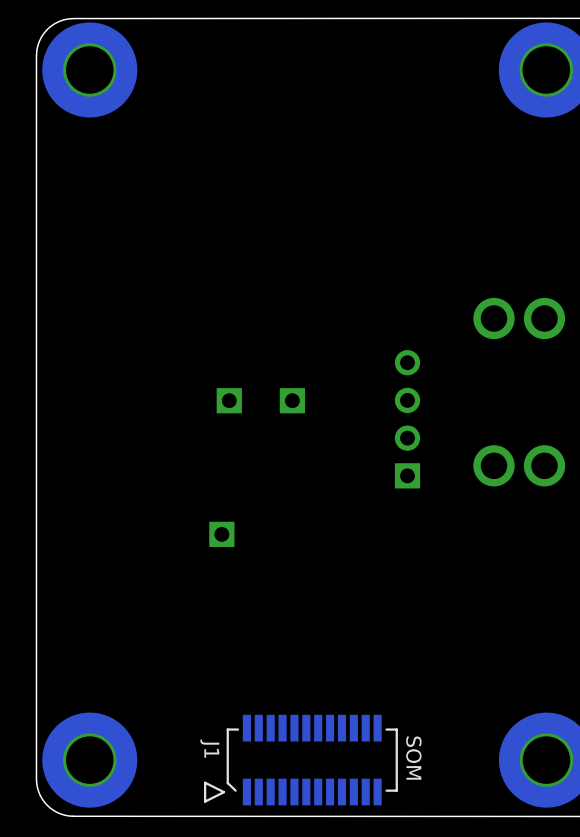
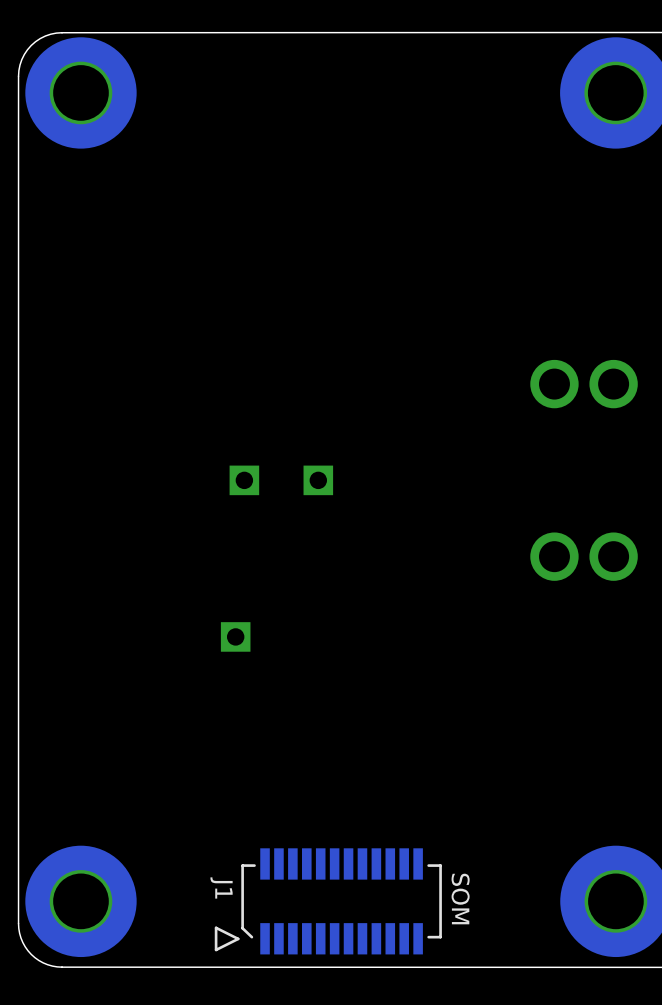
part: (407, 419) -> none

